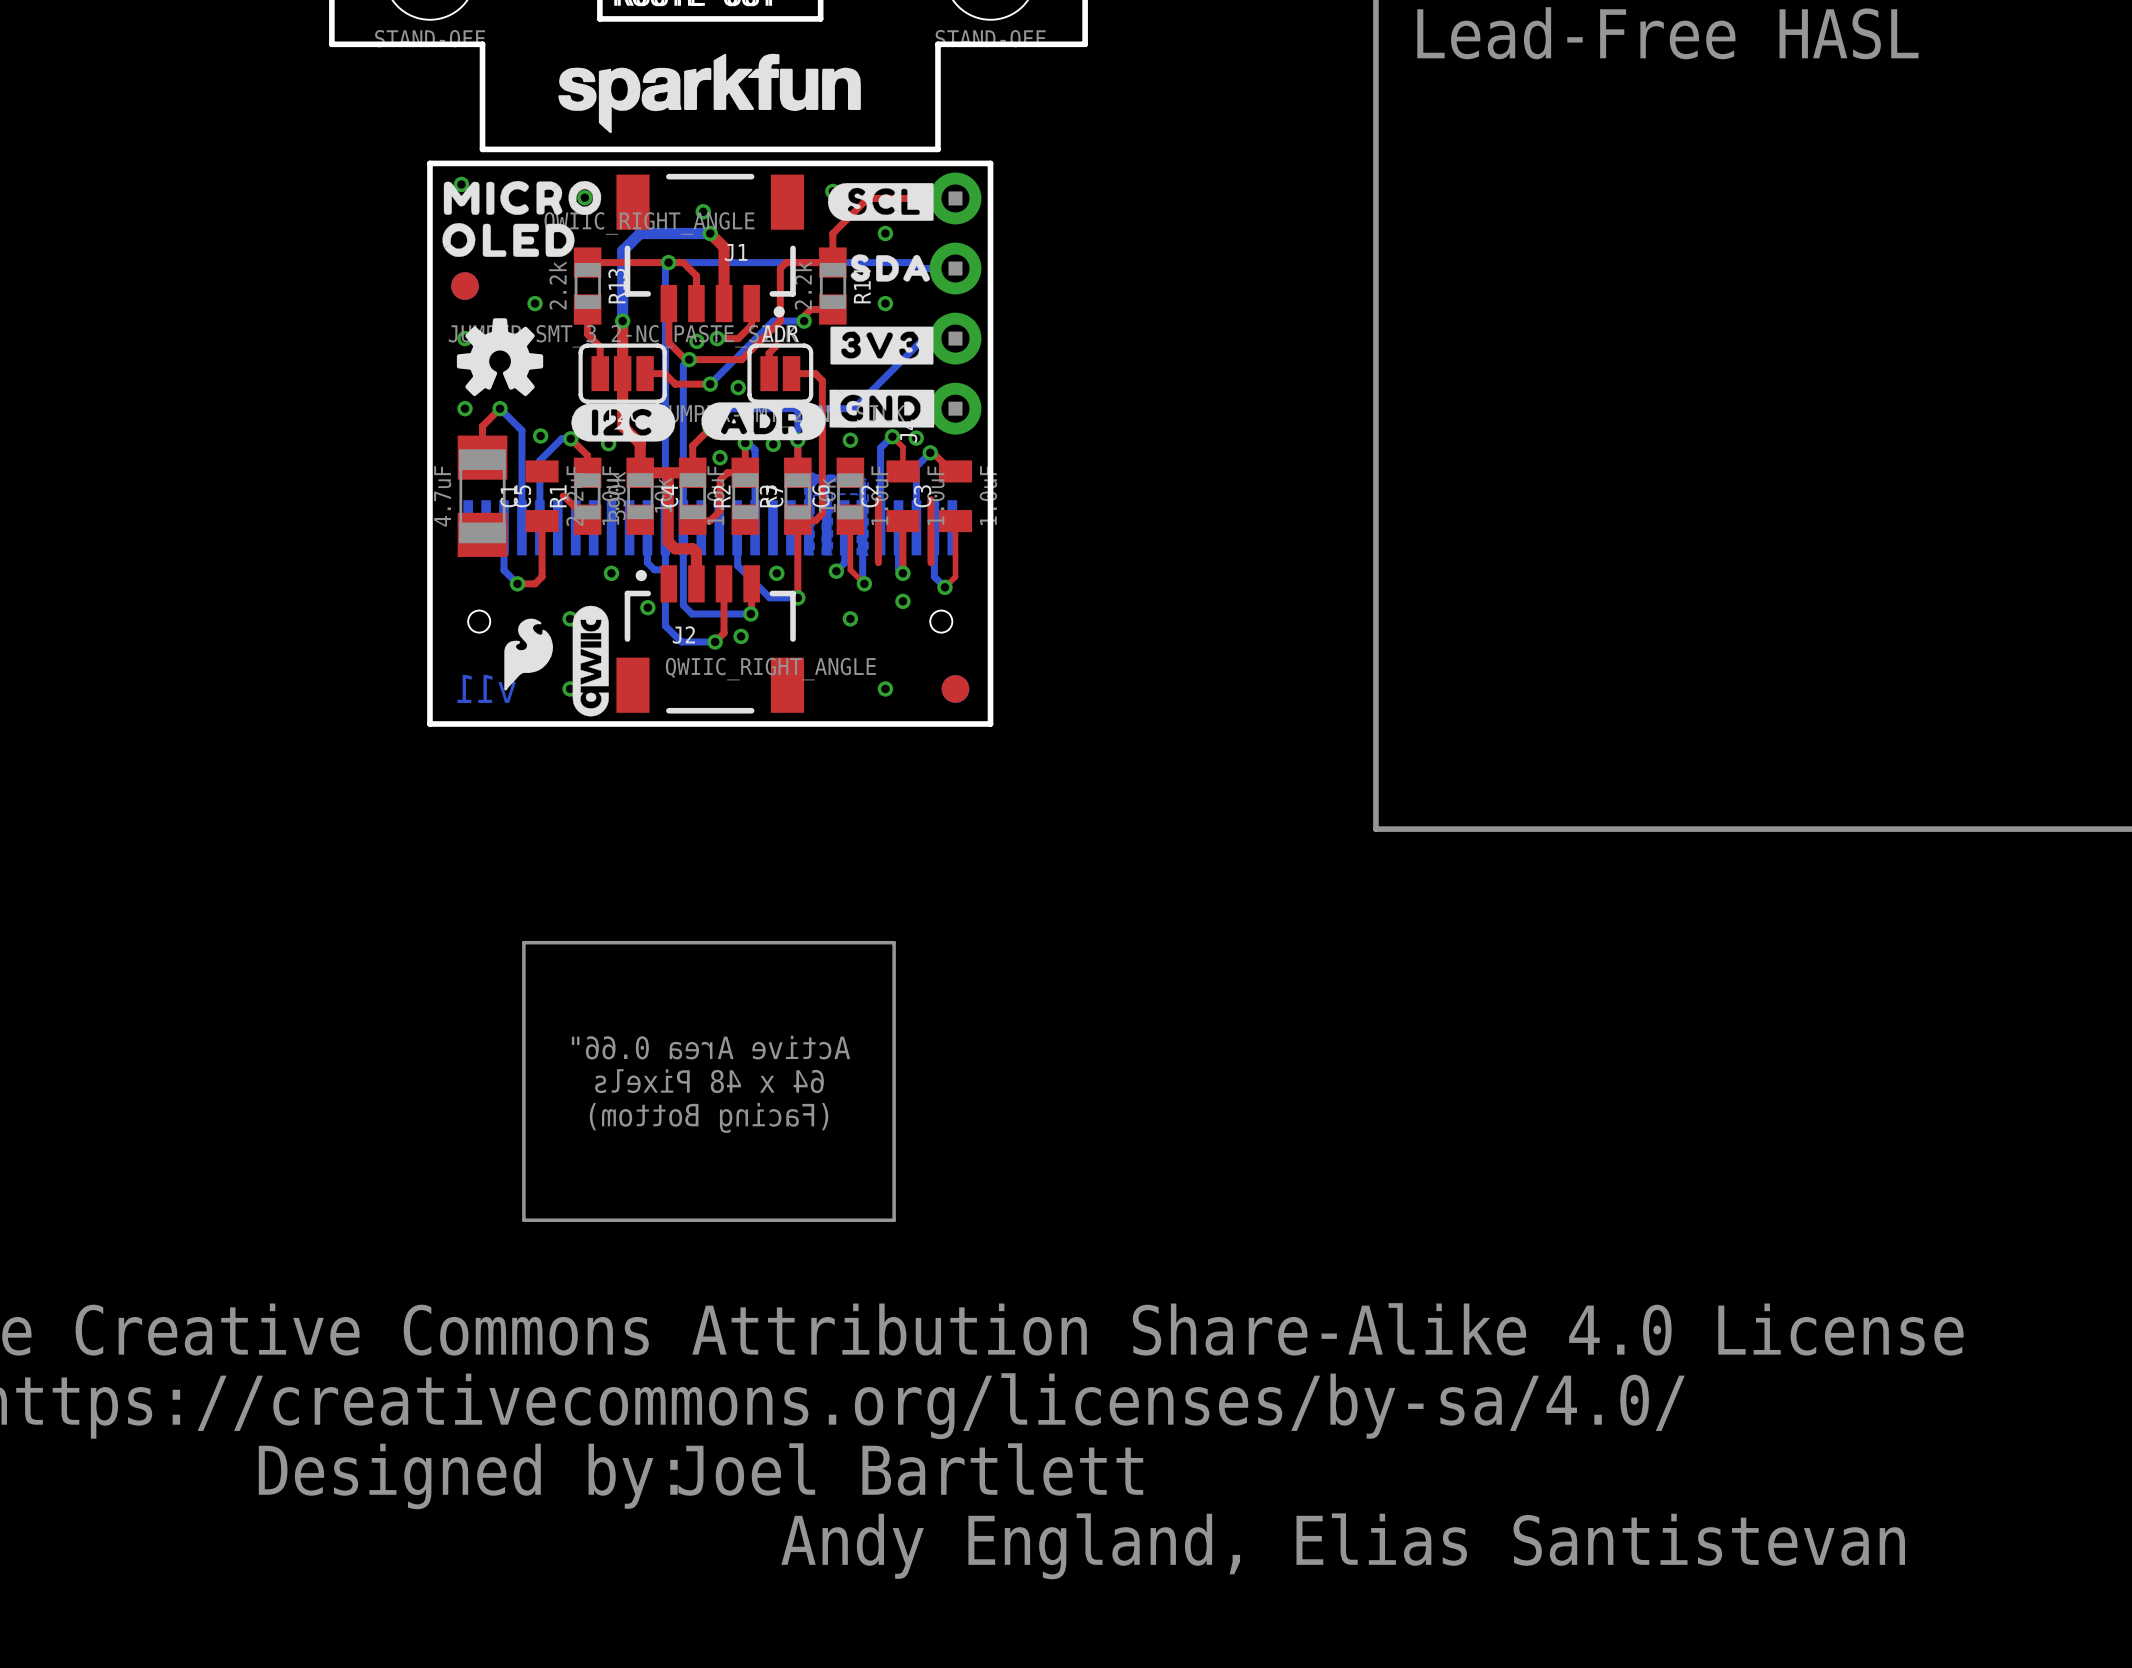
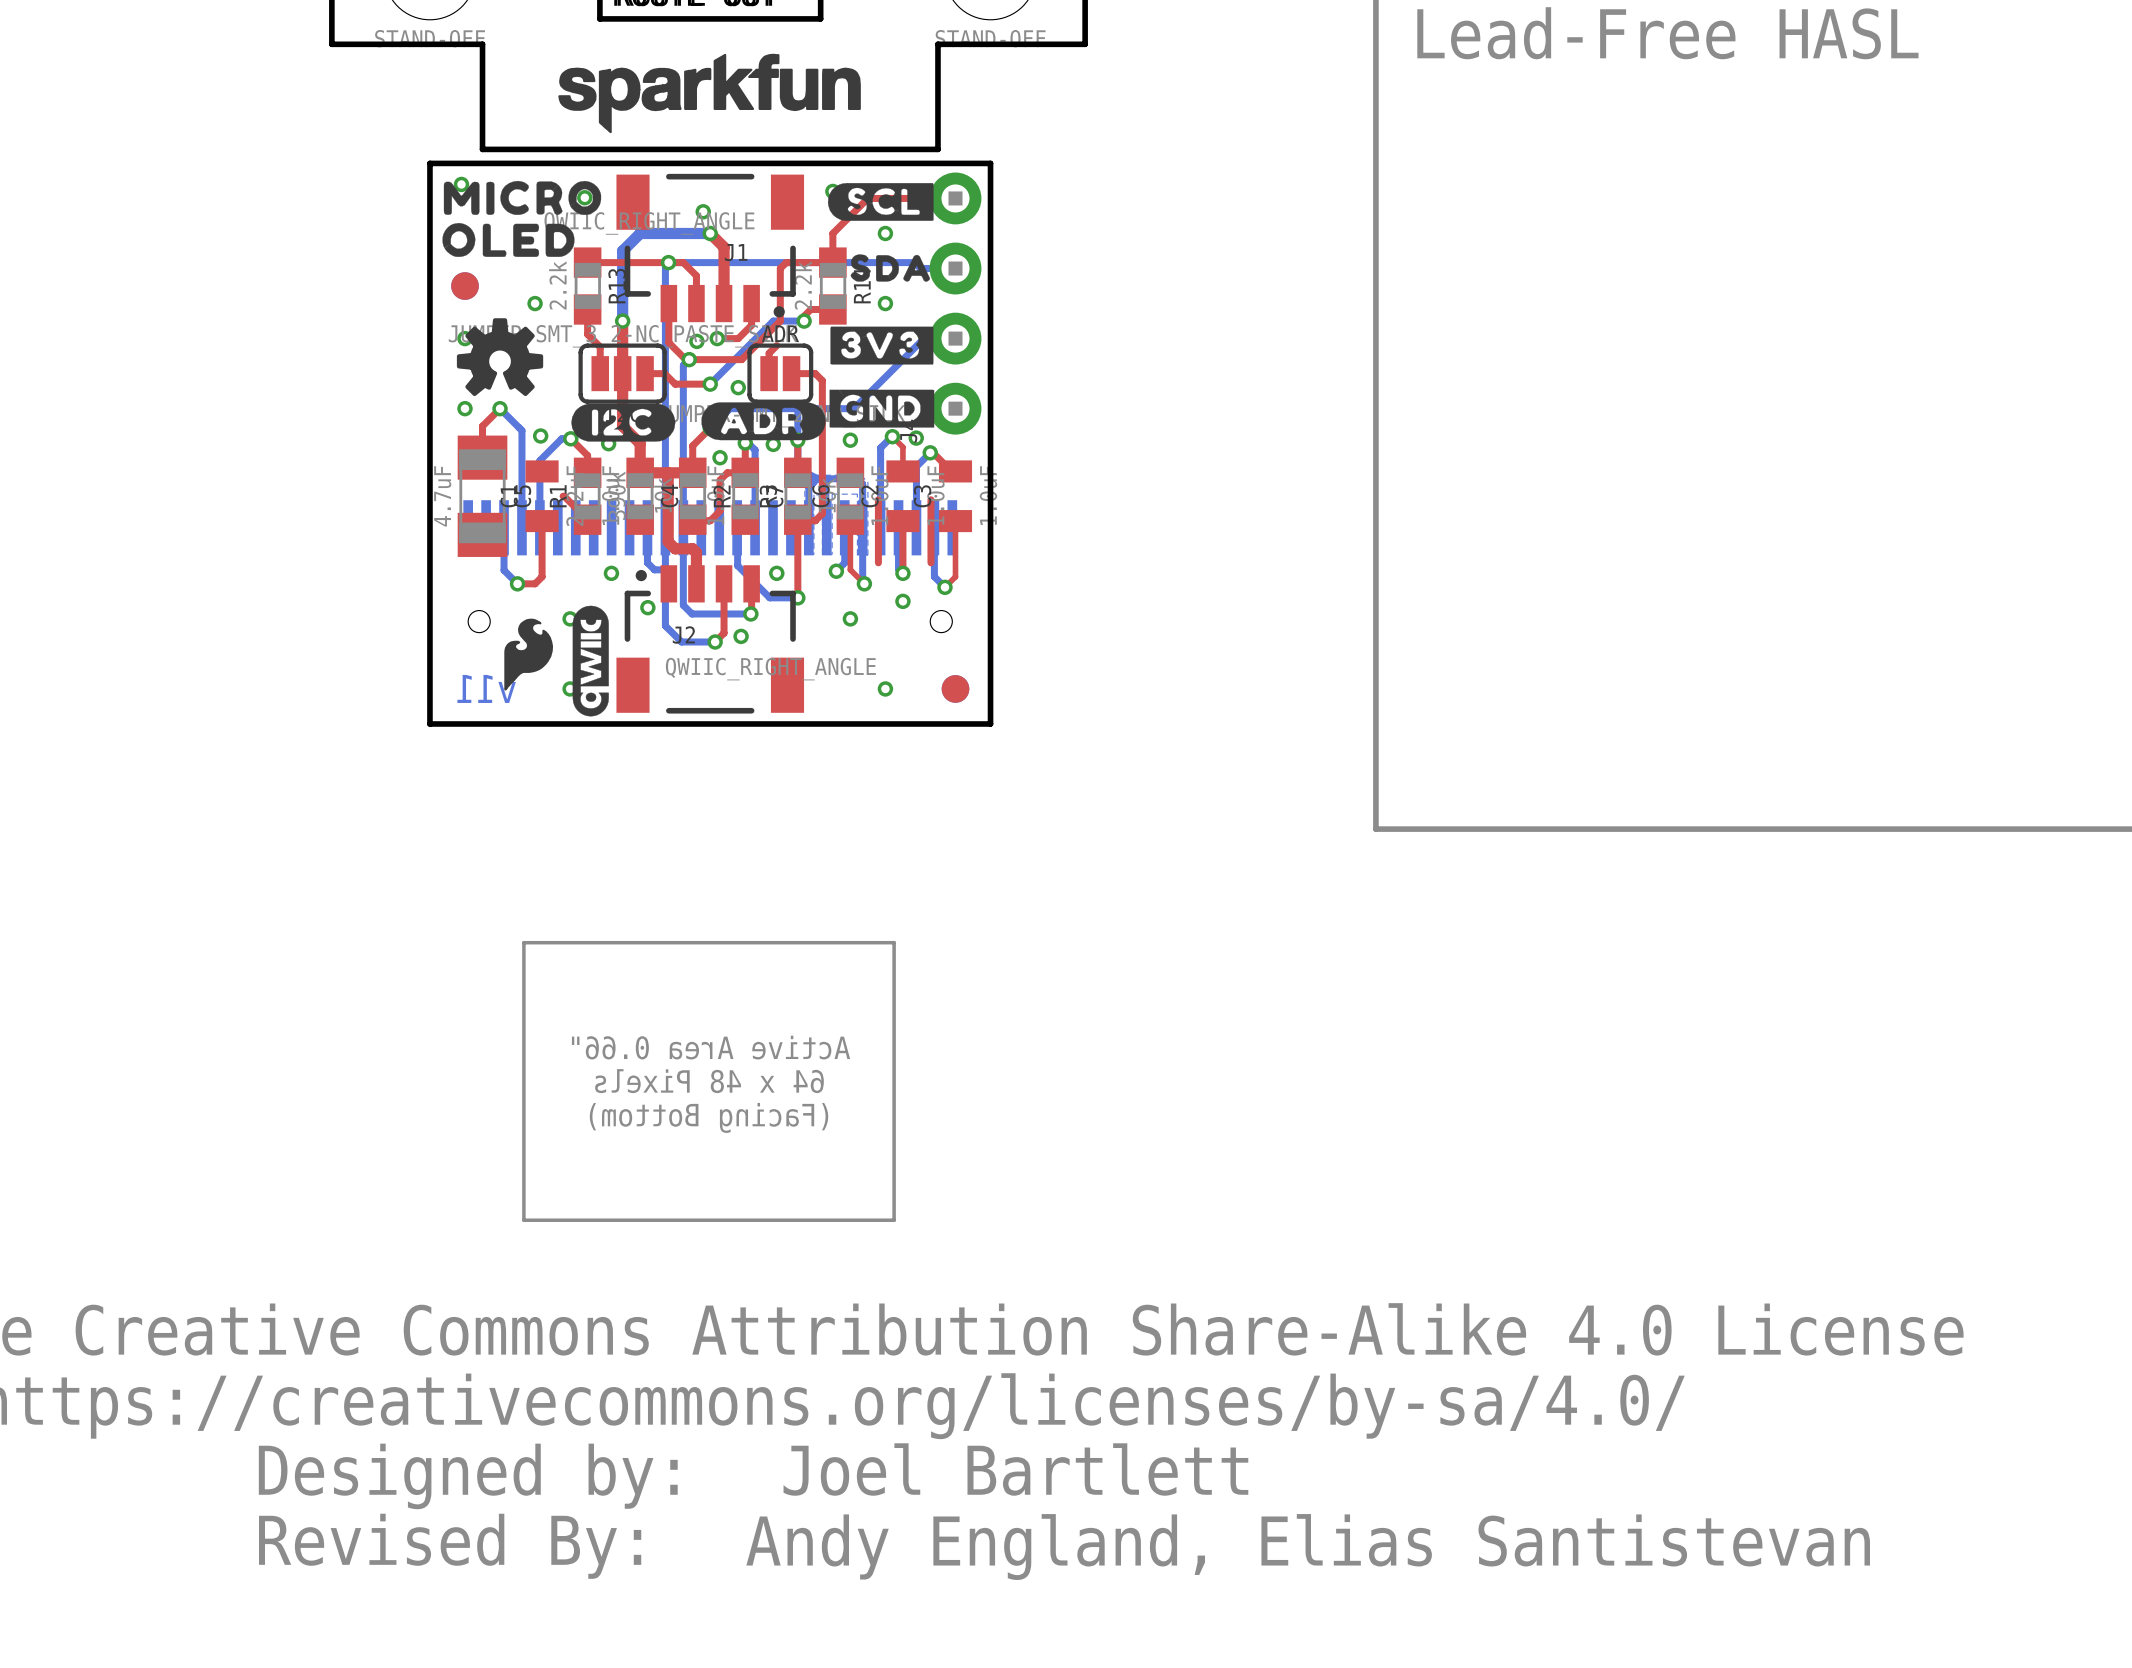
text position: Joel Bartlett (910, 1469) -> Joel Bartlett (1015, 1469)
text: none -> Revised By: (450, 1546)
text position: Andy England, Elias Santistevan (1343, 1546) -> Andy England, Elias Santistevan (1308, 1547)

